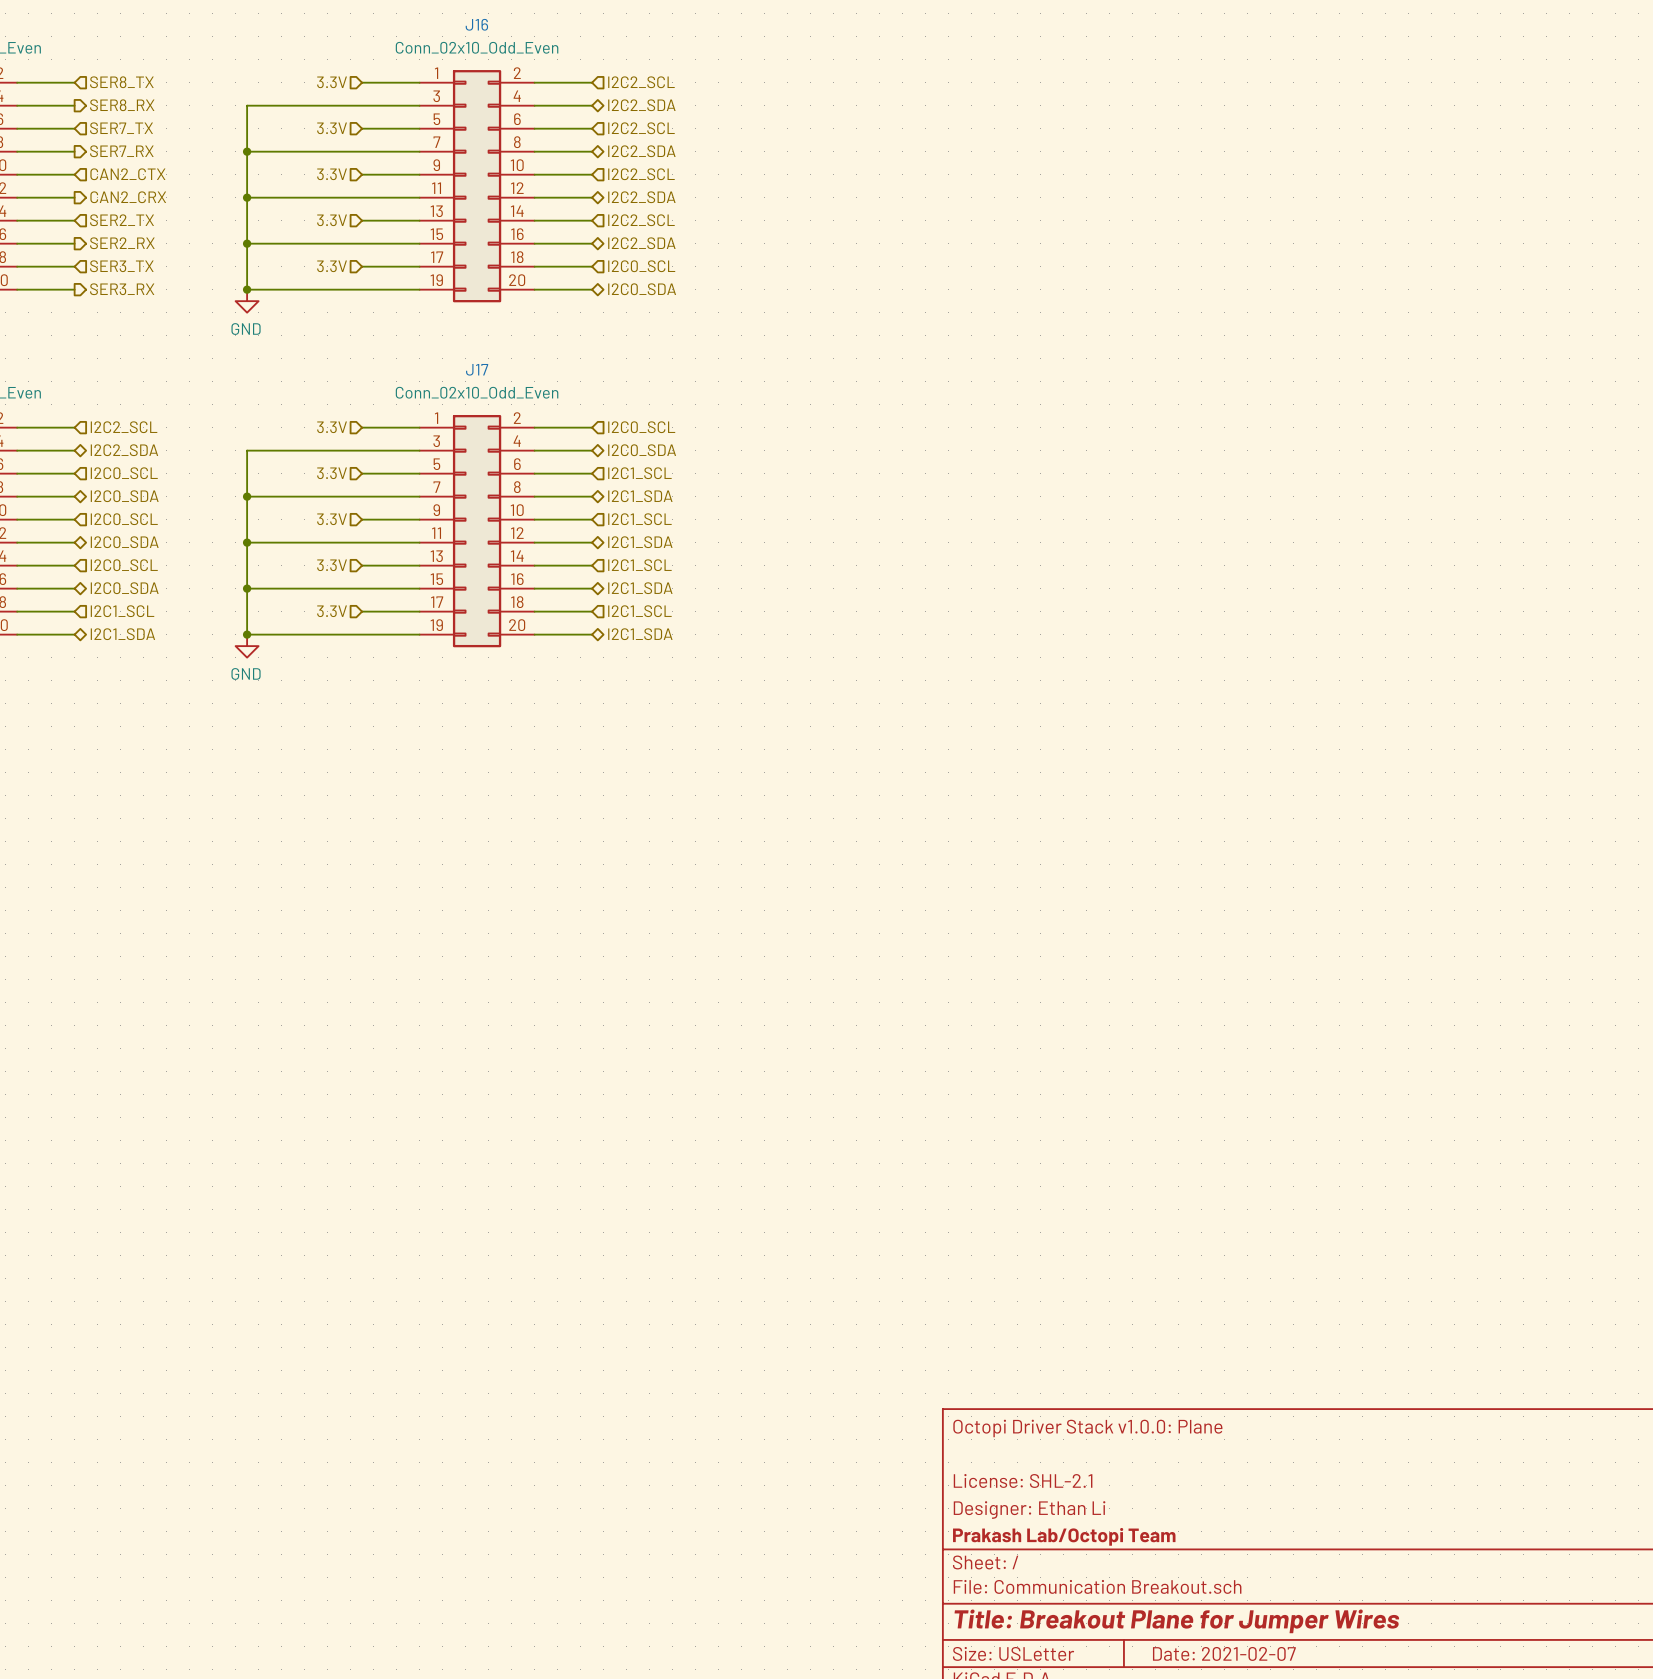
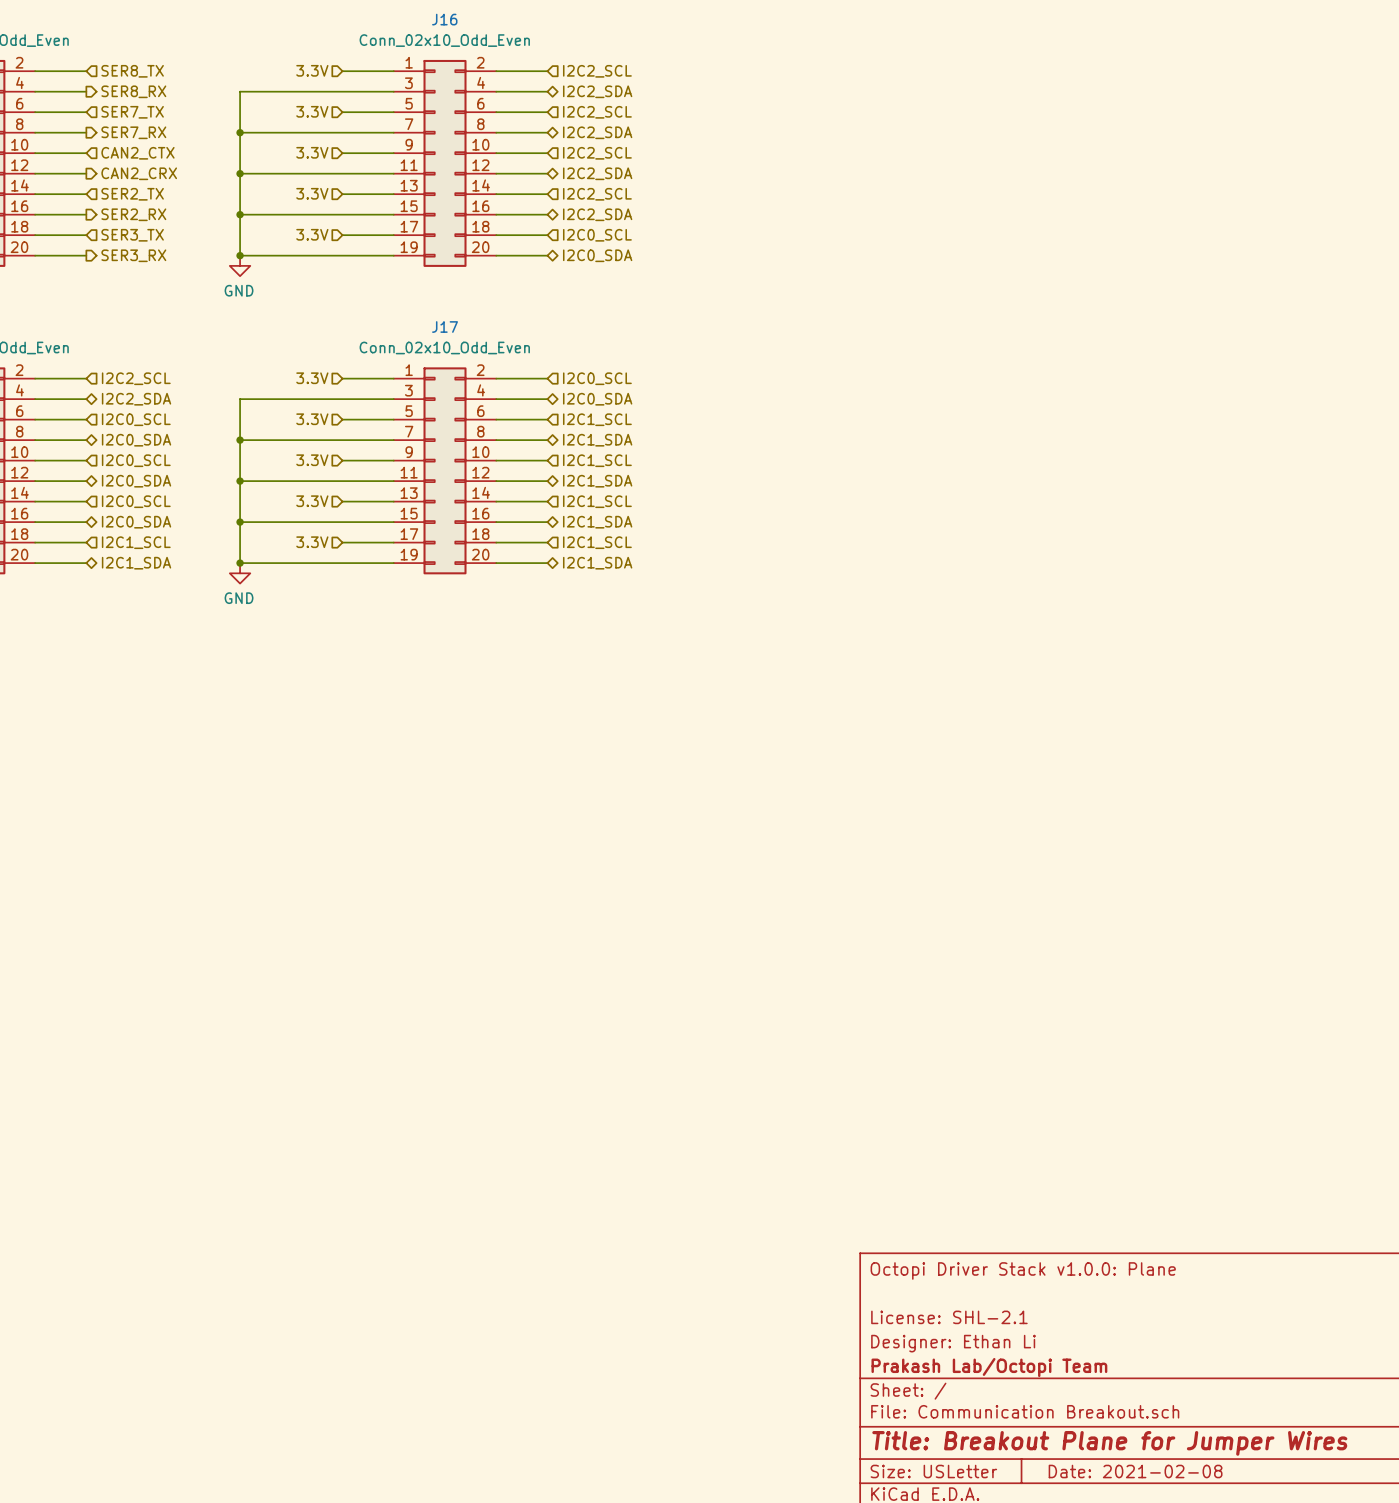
title block: Date: 2021-02-07 (1224, 1653) -> Date: 2021-02-08 (1135, 1471)

